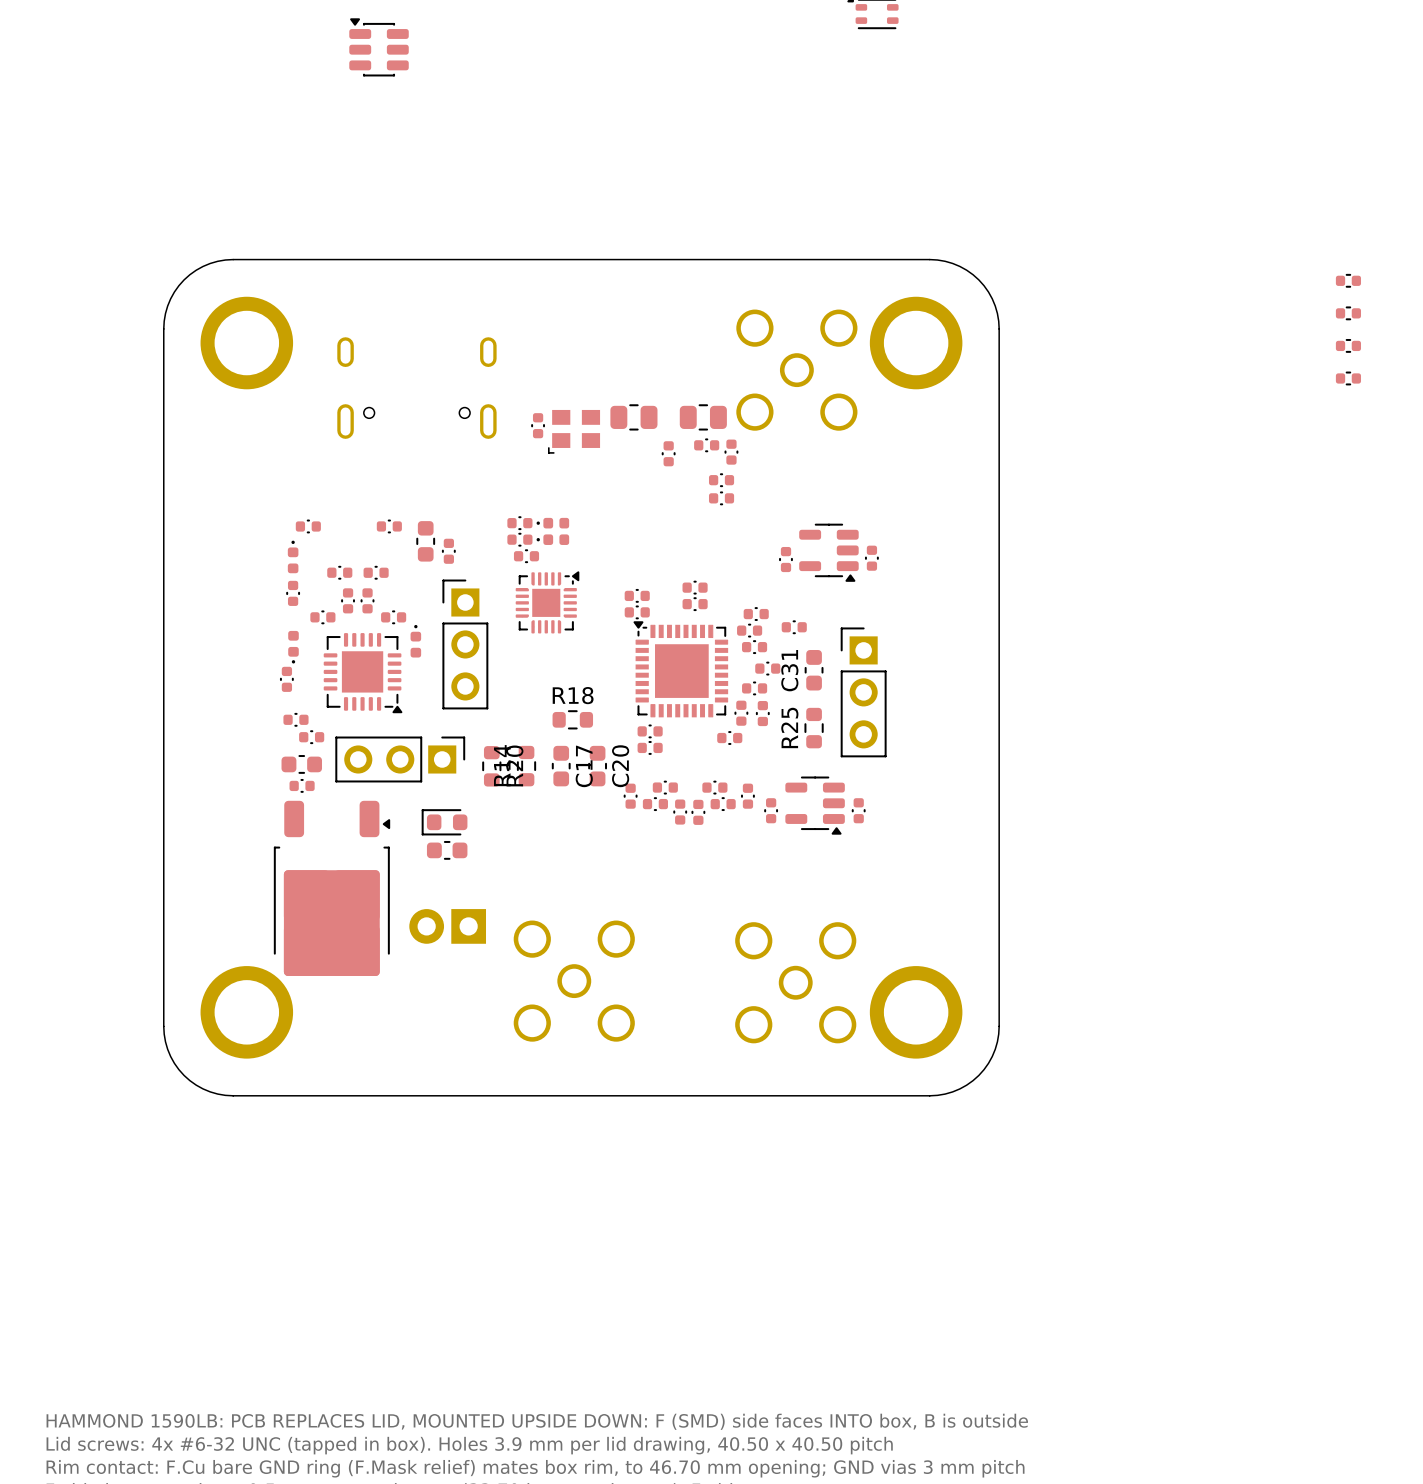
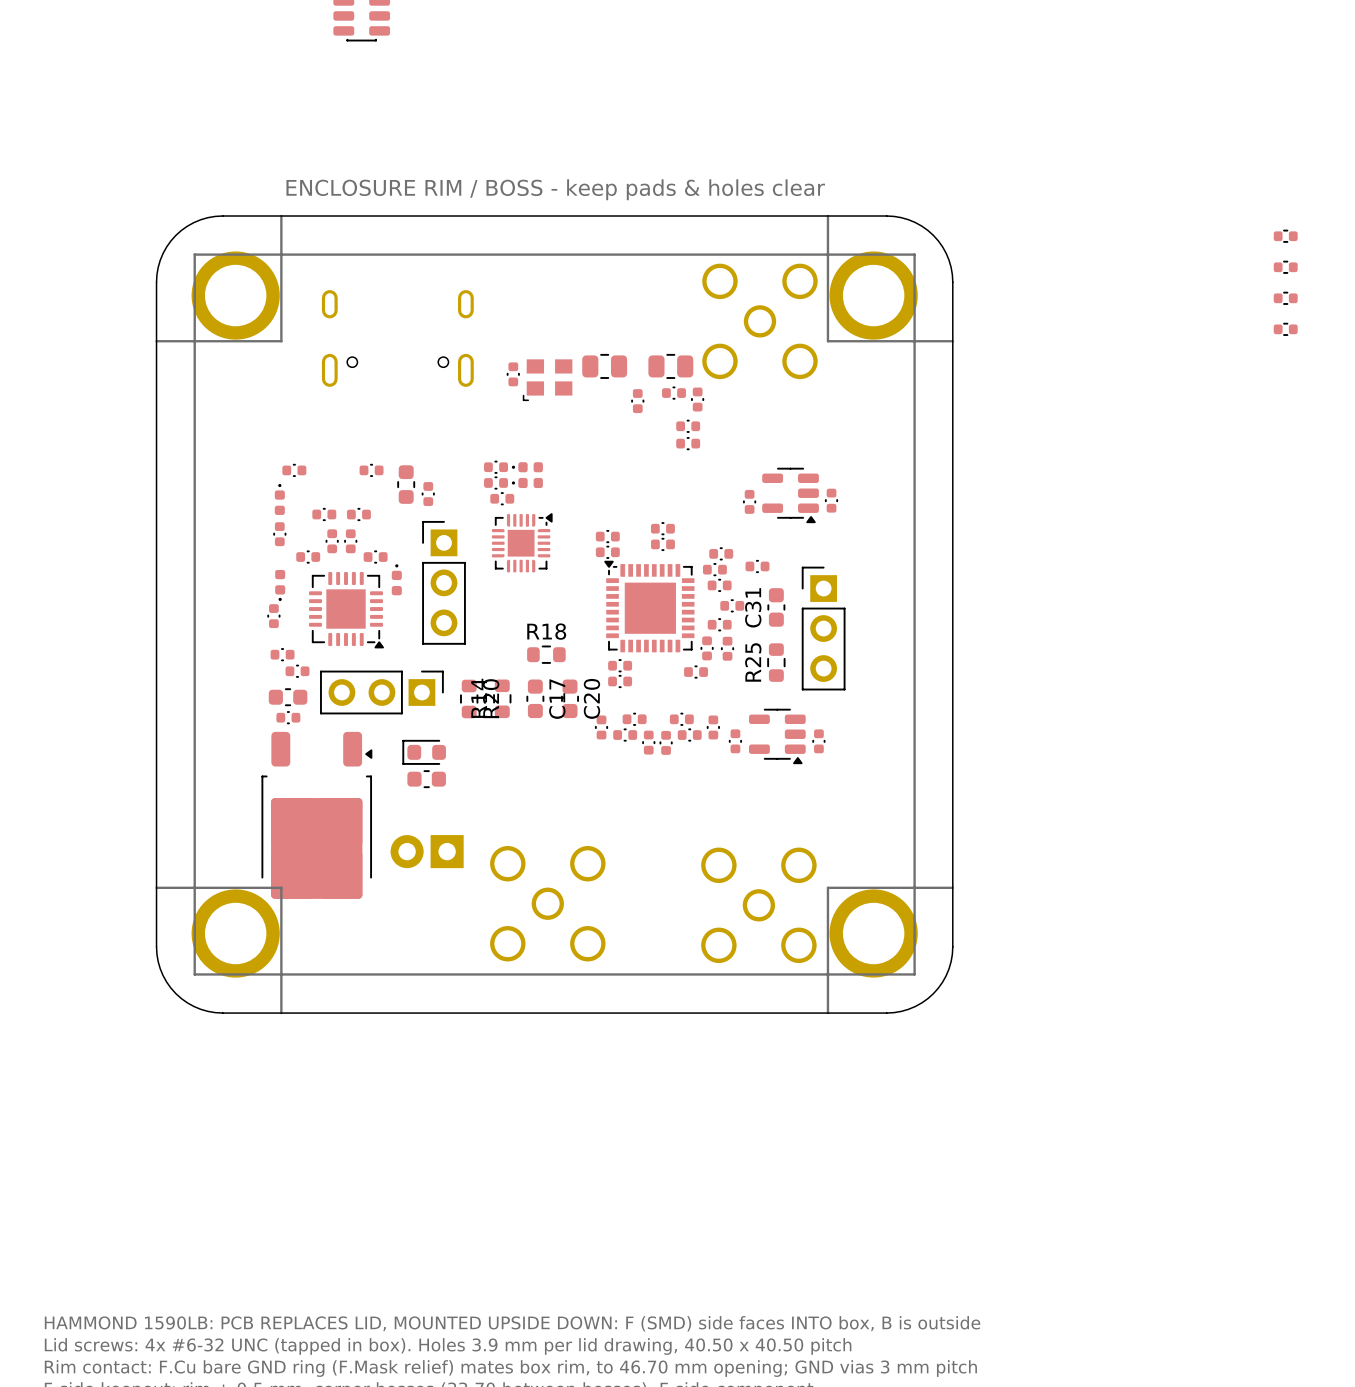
text: none -> ENCLOSURE RIM / BOSS - keep pads & holes clear (555, 189)
line: none -> (281, 216) (281, 341) (156, 341)
line: none -> (827, 216) (827, 341) (952, 341)
line: none -> (194, 254) (914, 254) (914, 974) (194, 974) (194, 254)
line: none -> (156, 887) (281, 887) (281, 1013)
line: none -> (952, 887) (827, 887) (827, 1013)

